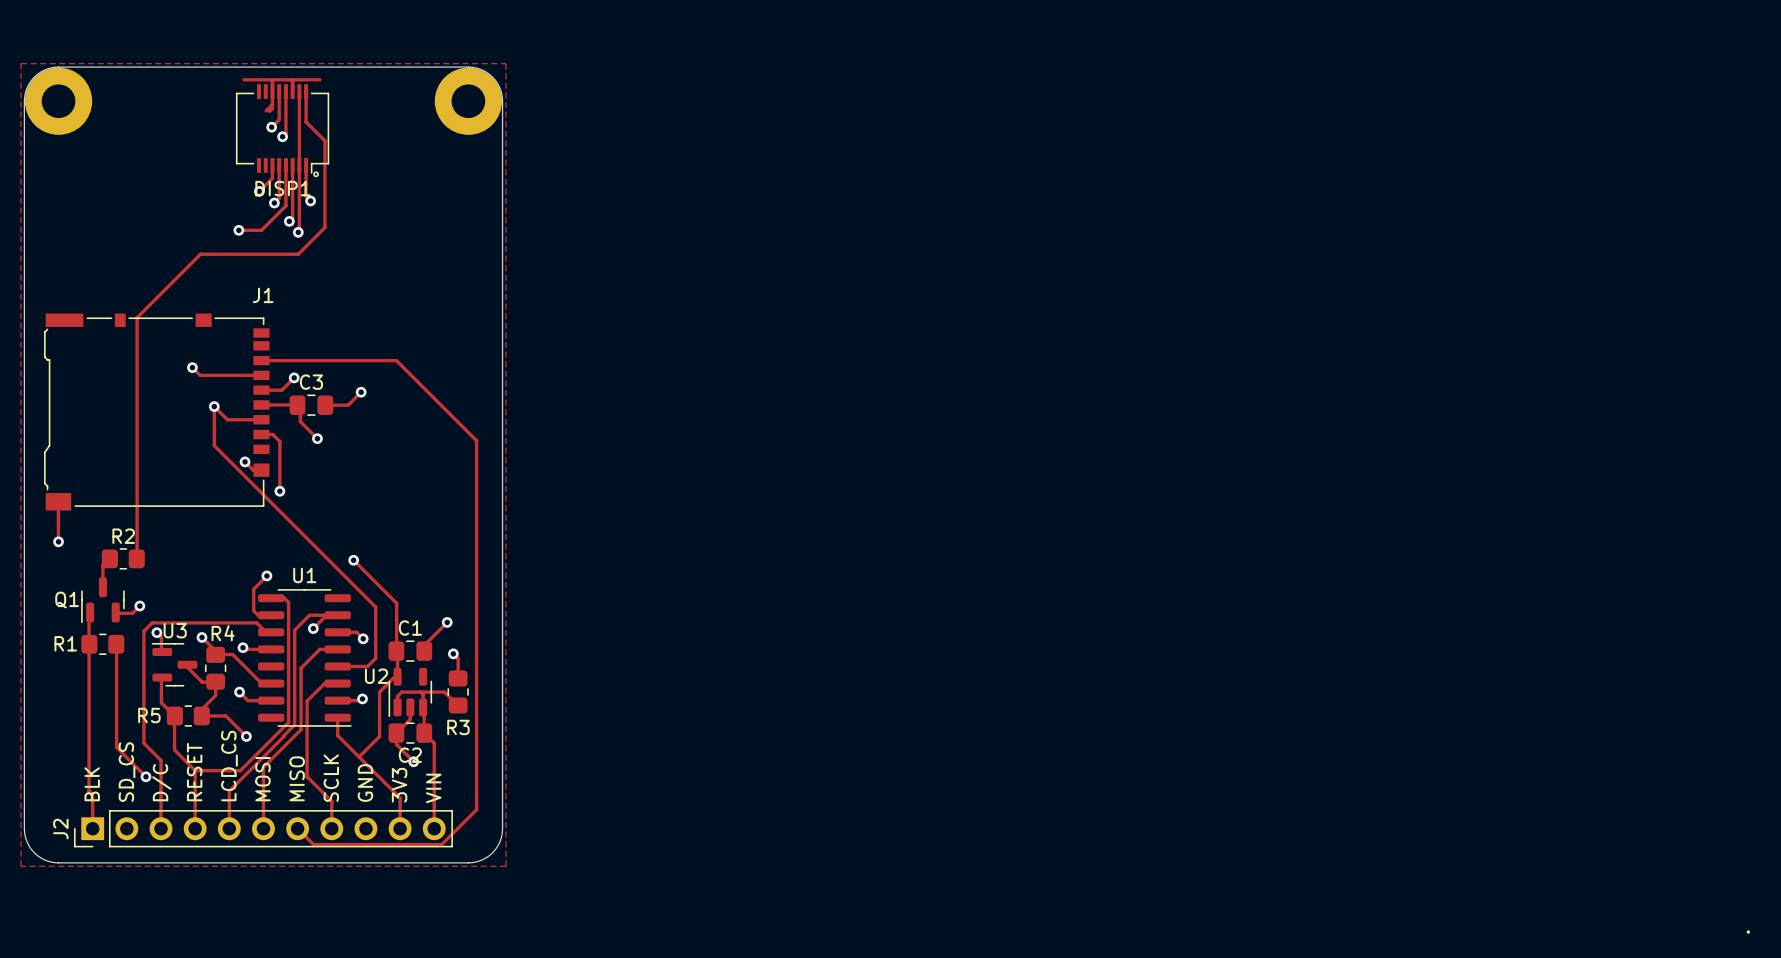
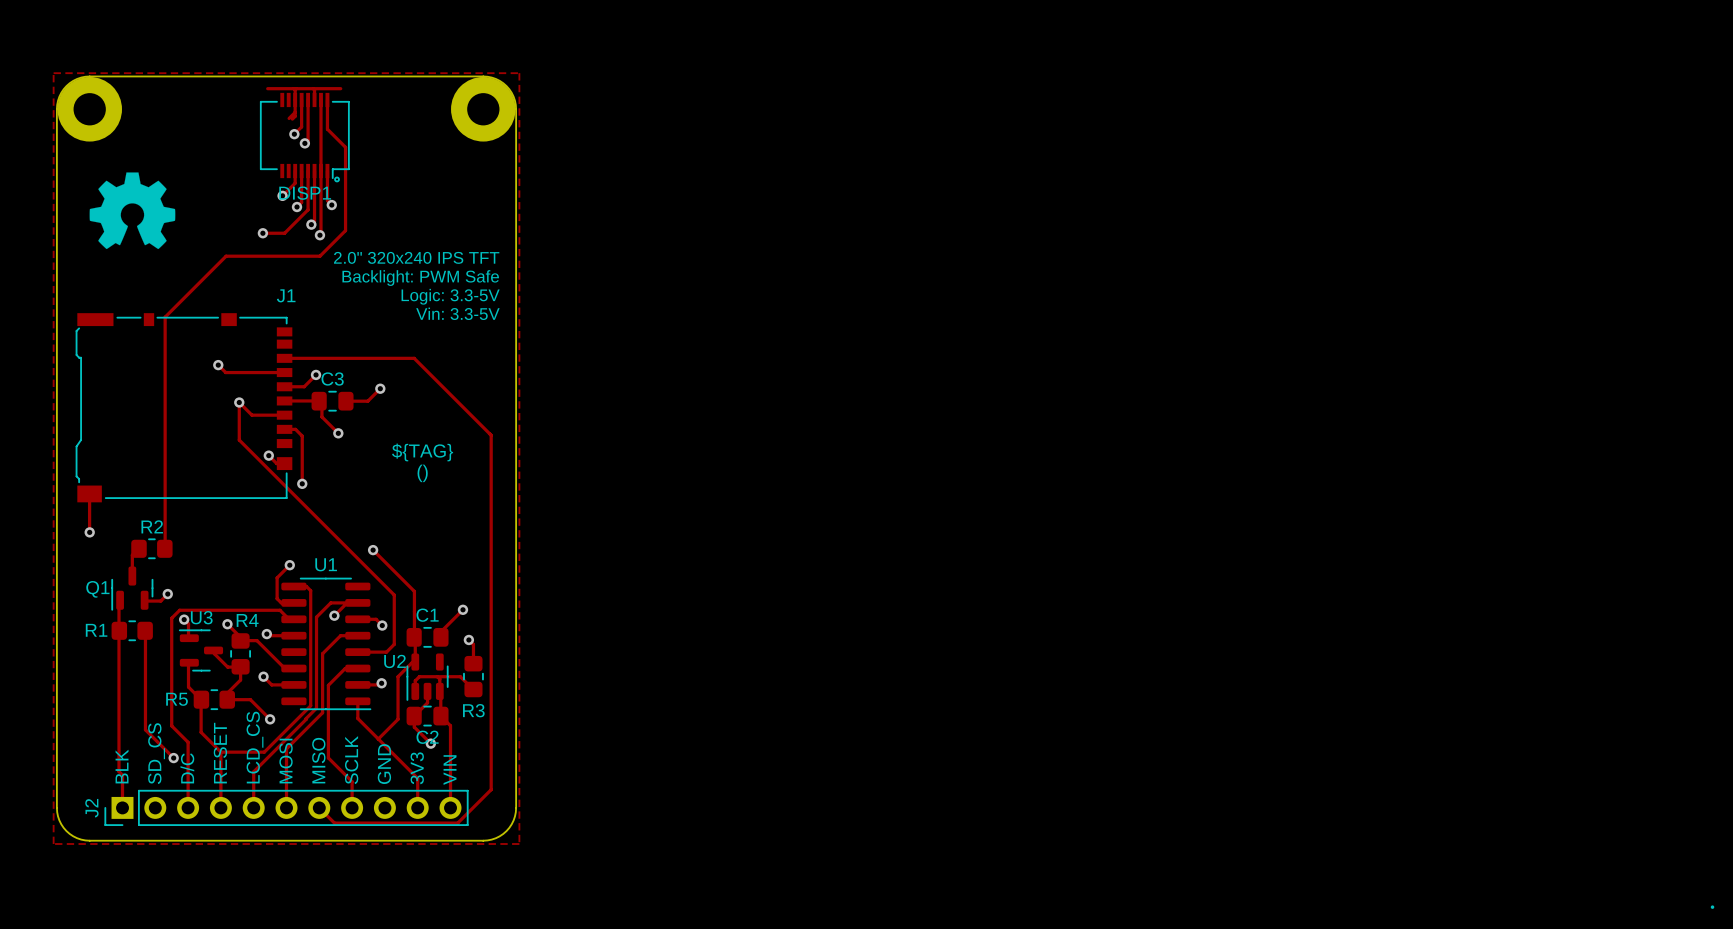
drawing: none -> [89, 172, 176, 250]
text: none -> 2.0" 320x240 IPS TFT (416, 257)
text: none -> Backlight: PWM Safe (420, 278)
text: none -> Logic: 3.3-5V (450, 296)
text: none -> Vin: 3.3-5V (457, 313)
text: none -> ${TAG} (422, 452)
text: none -> () (422, 473)

